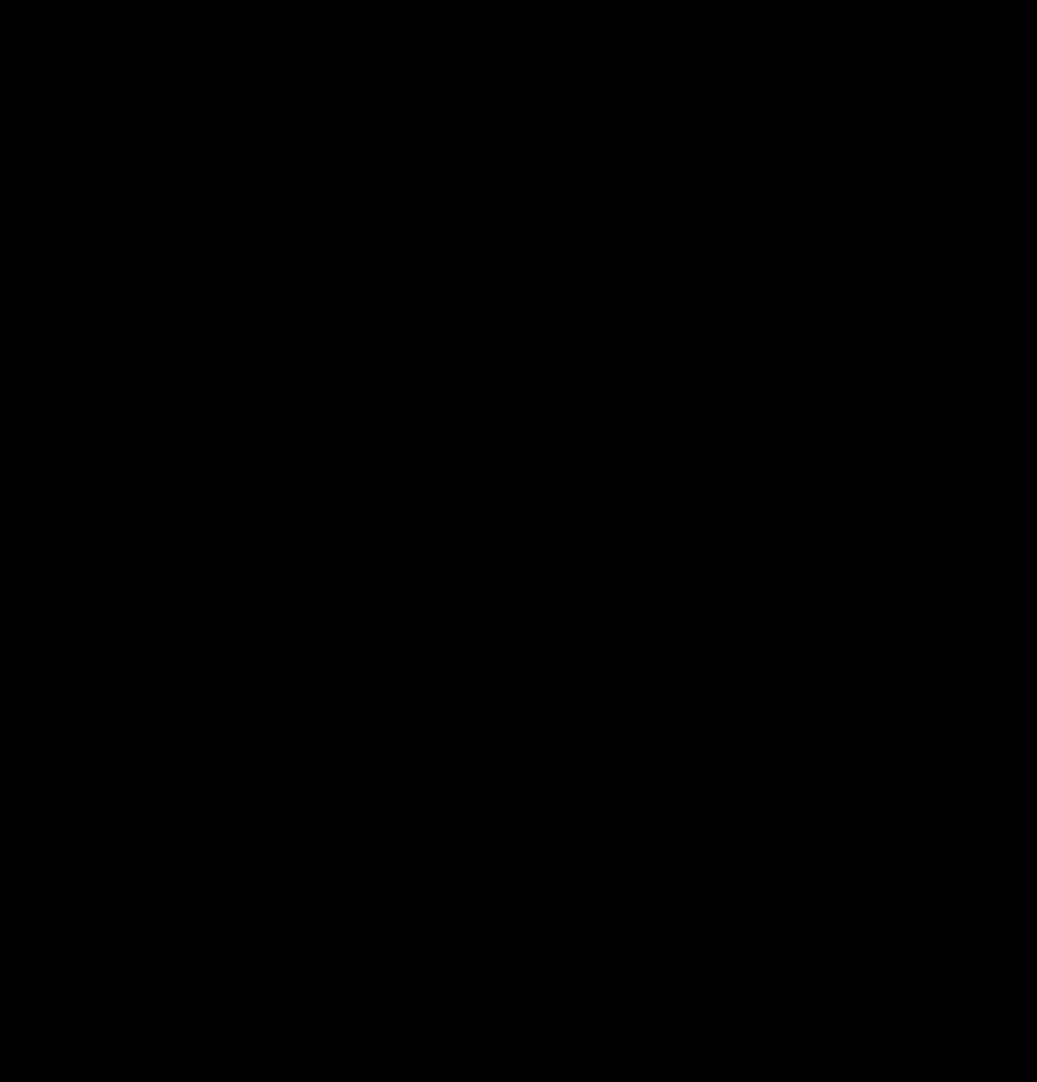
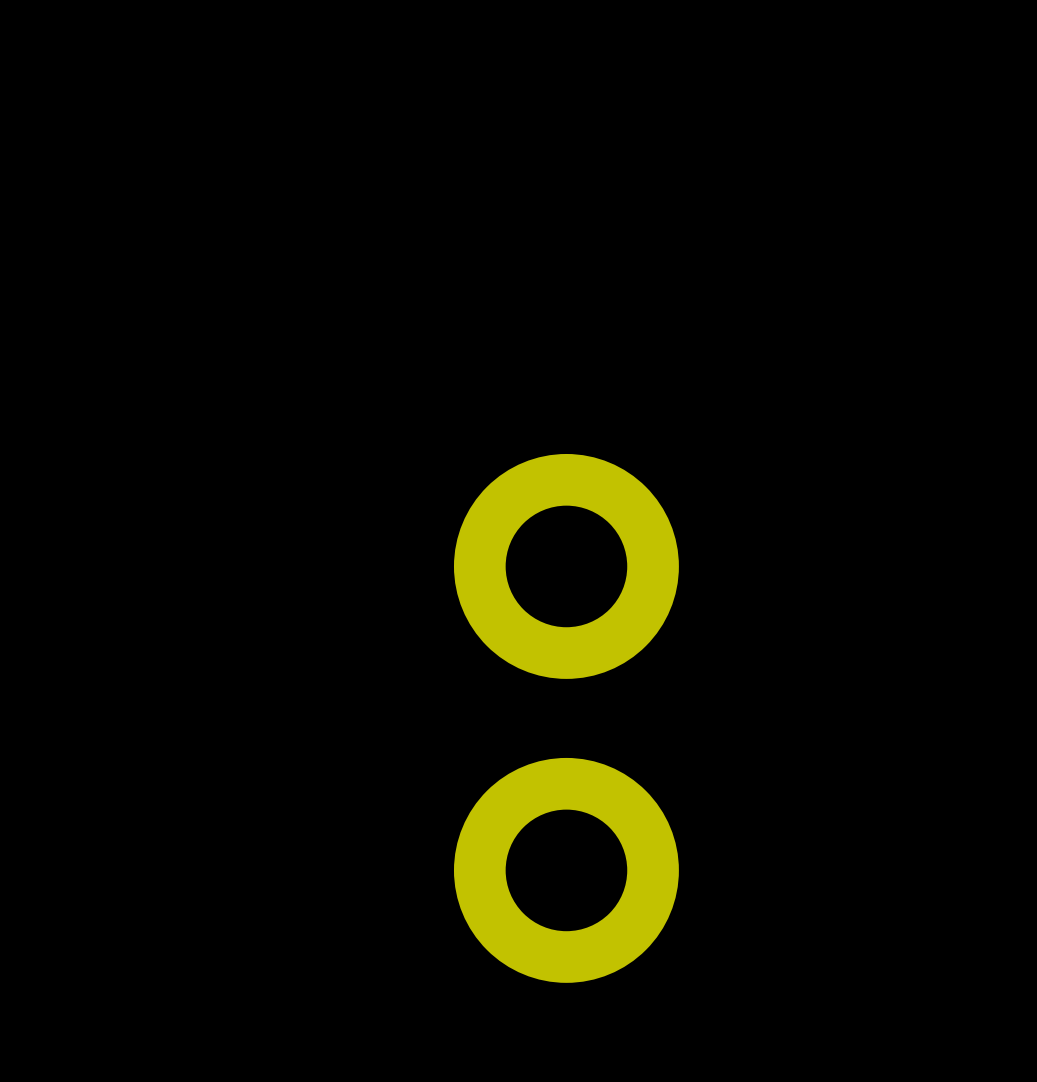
part: none -> (566, 718)

